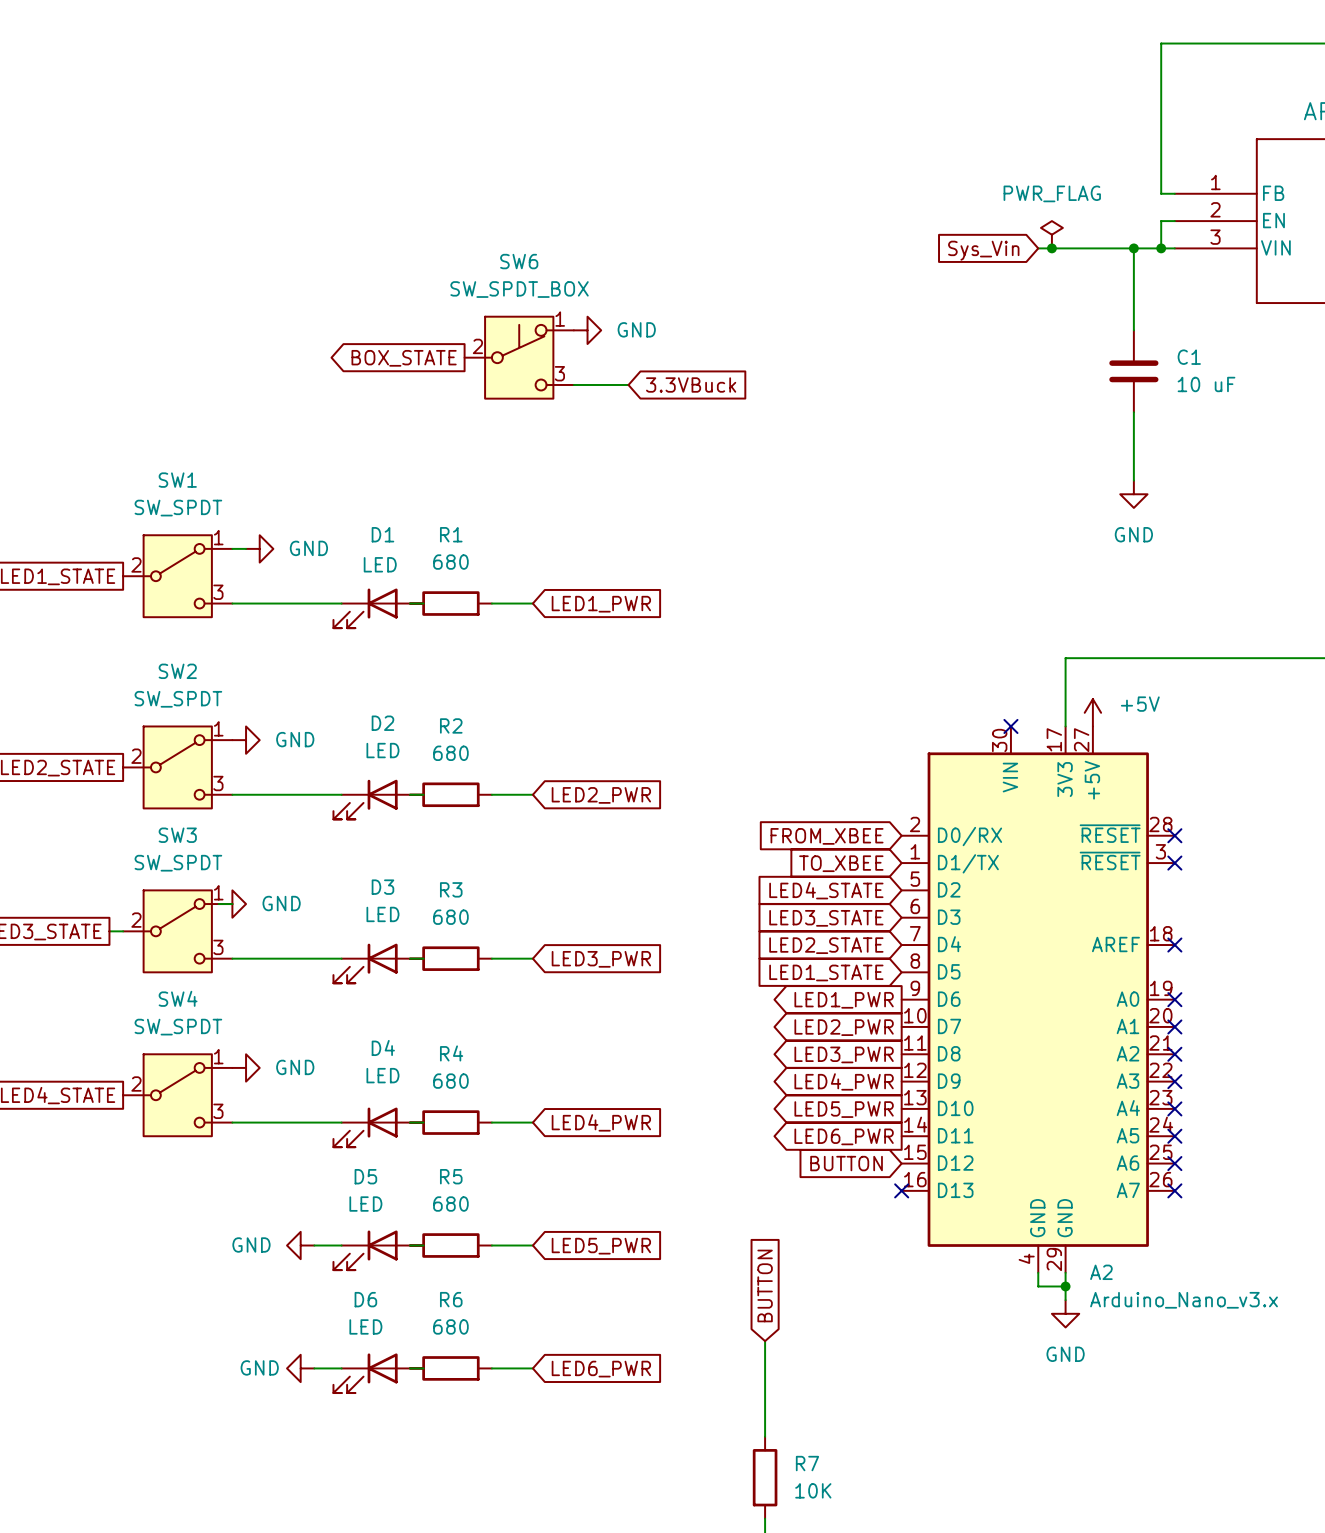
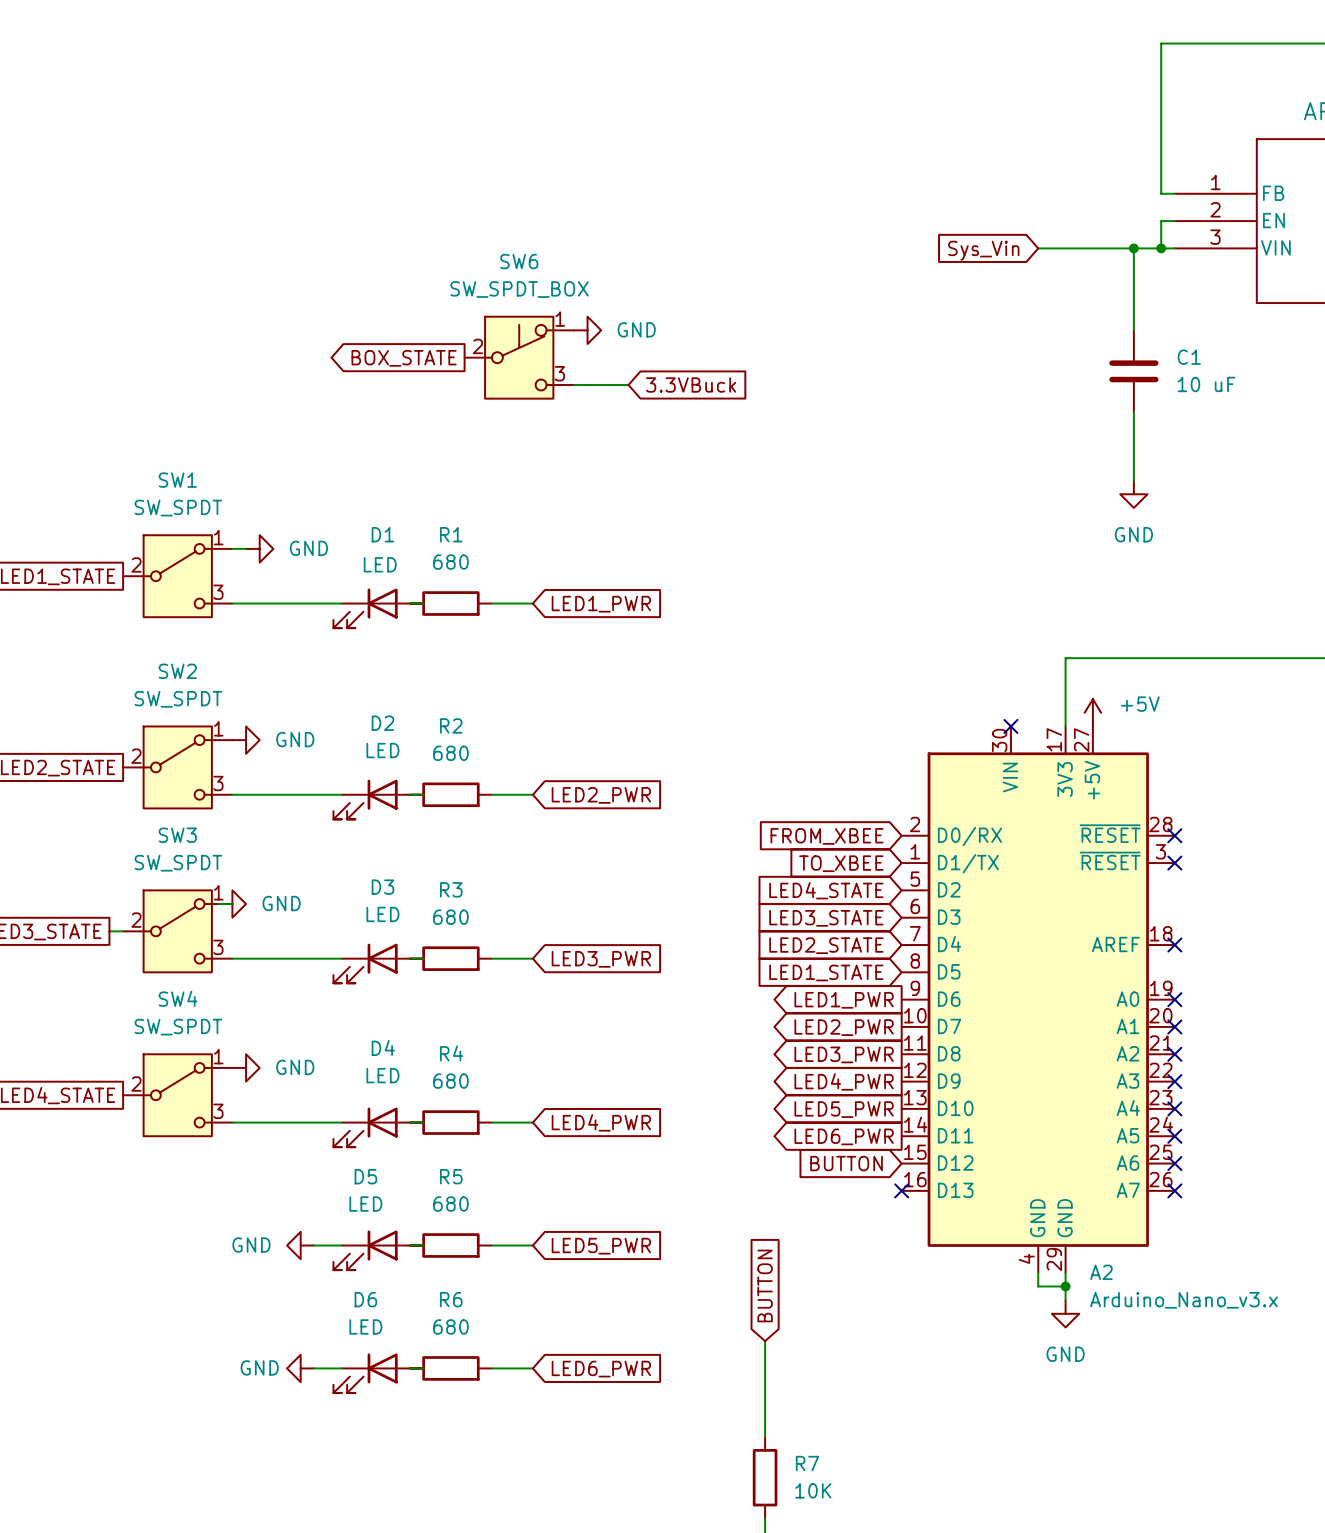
power symbol: PWR_FLAG (1051, 234) -> none
junction: (1051, 248) -> none

